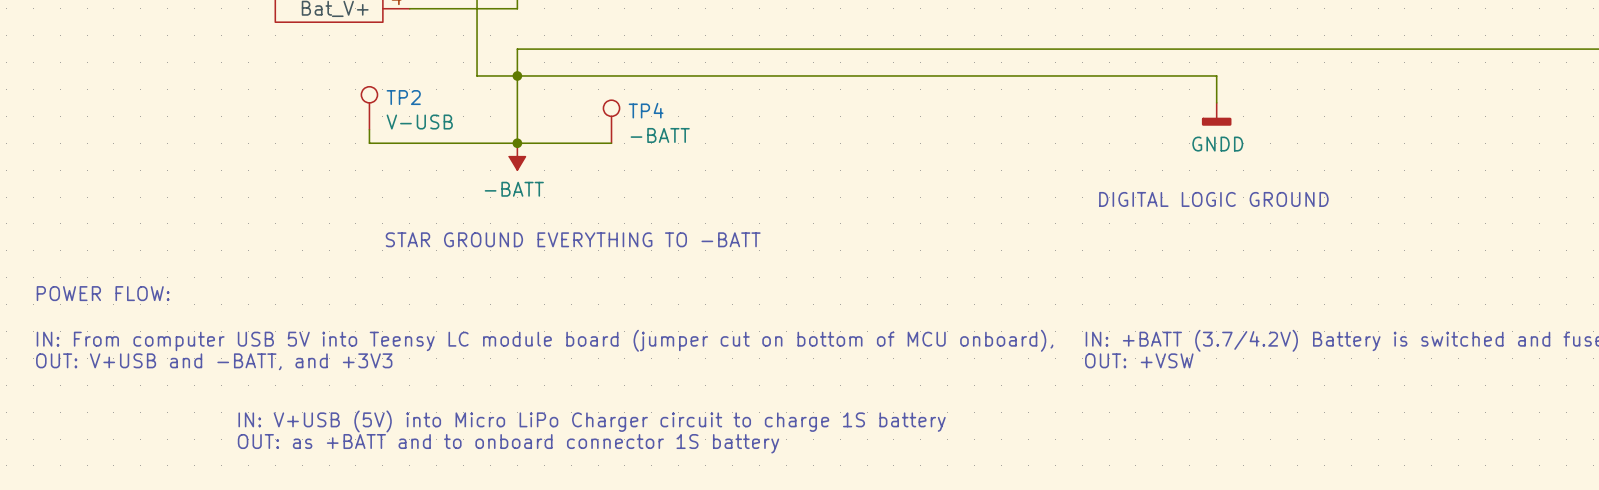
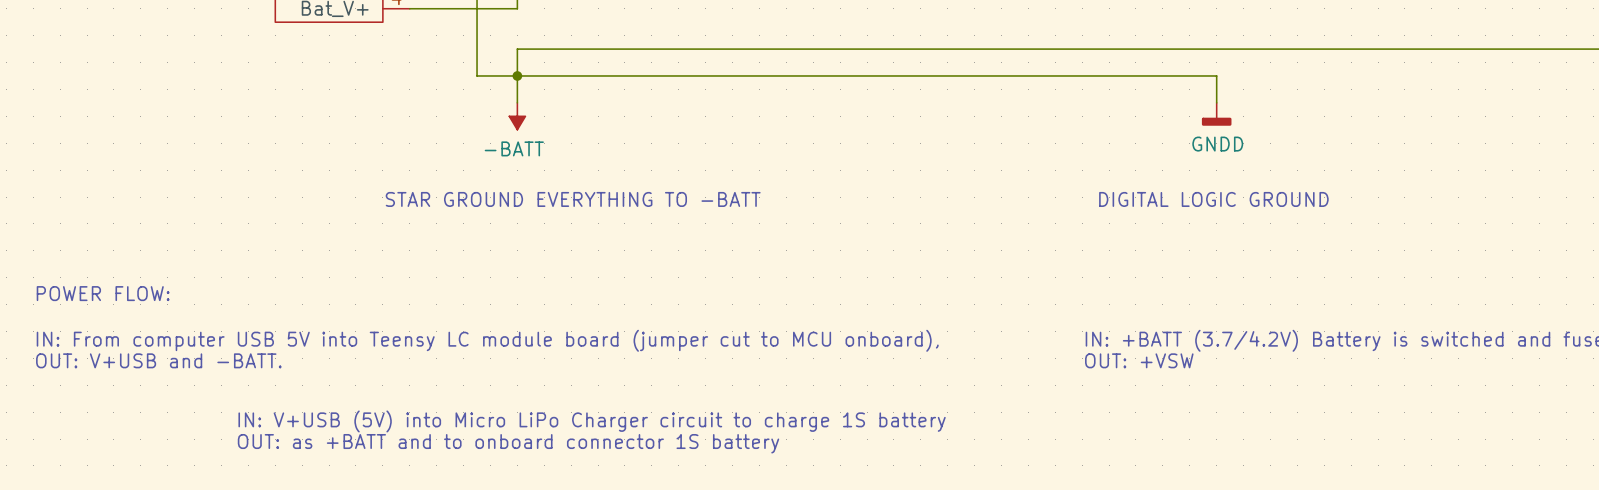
TP2: V-USB (369, 108) -> none
TP4: -BATT (611, 121) -> none
wire: (369, 129) (369, 143) (611, 143) -> none
junction: (517, 143) -> none
power symbol position: -BATT (517, 156) -> -BATT (517, 116)
text position: STAR GROUND EVERYTHING TO -BATT (573, 239) -> STAR GROUND EVERYTHING TO -BATT (573, 199)
text: IN: From computer USB 5V into Teensy LC module board (jumper cut on bottom of MCU onboard), (545, 340) -> IN: From computer USB 5V into Teensy LC module board (jumper cut to MCU onboard), (487, 340)
text: OUT: V+USB and -BATT, and +3V3 (214, 361) -> OUT: V+USB and -BATT. (158, 360)

